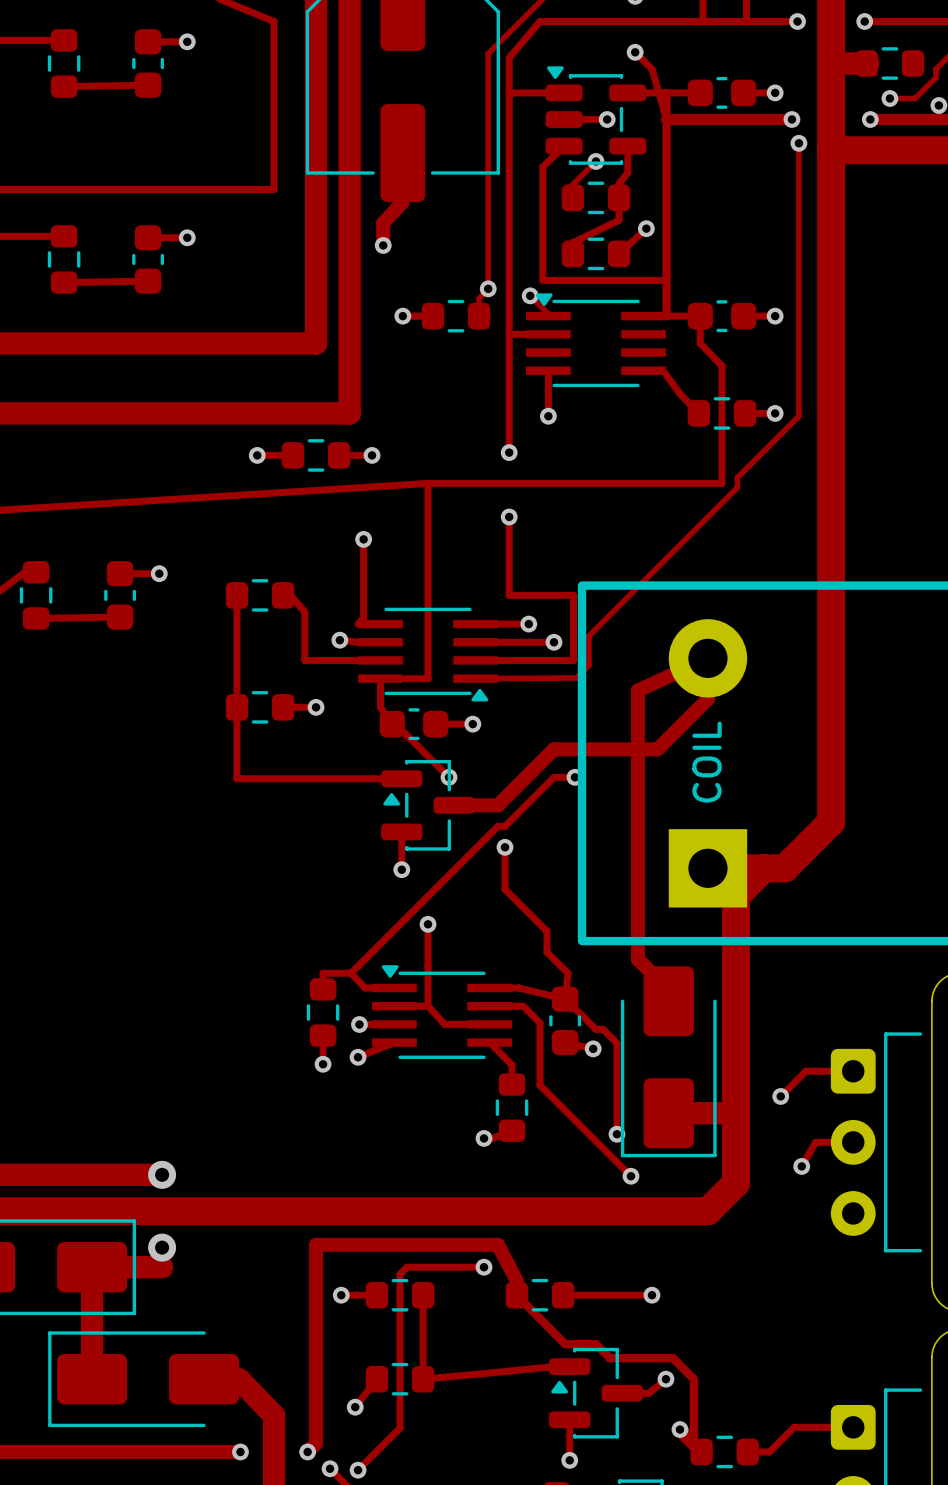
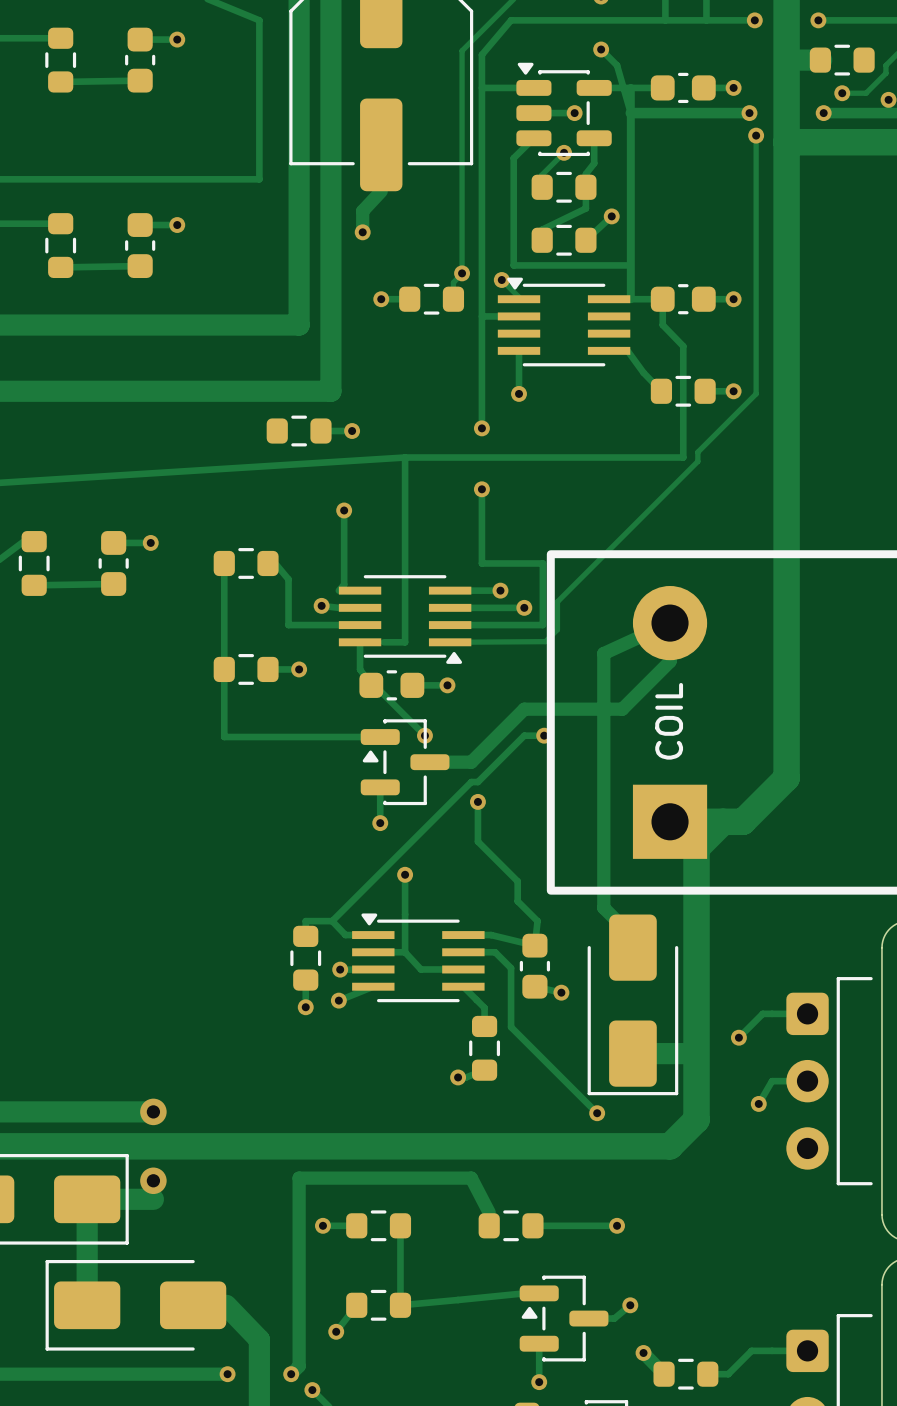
track: (257, 455) (292, 455) -> none
via: (257, 455) -> none
track: (565, 999) (595, 1029) (602, 1029) (616, 1043) (616, 1134) -> none
via: (616, 1134) -> none
track: (484, 1267) (407, 1267) (400, 1274) (400, 1428) (358, 1470) -> none
via: (484, 1267) -> none
track: (516, 1295) (565, 1344) (595, 1344) (609, 1358) (672, 1358) (693, 1379) (693, 1442) (701, 1451) -> none
via: (358, 1470) -> none

